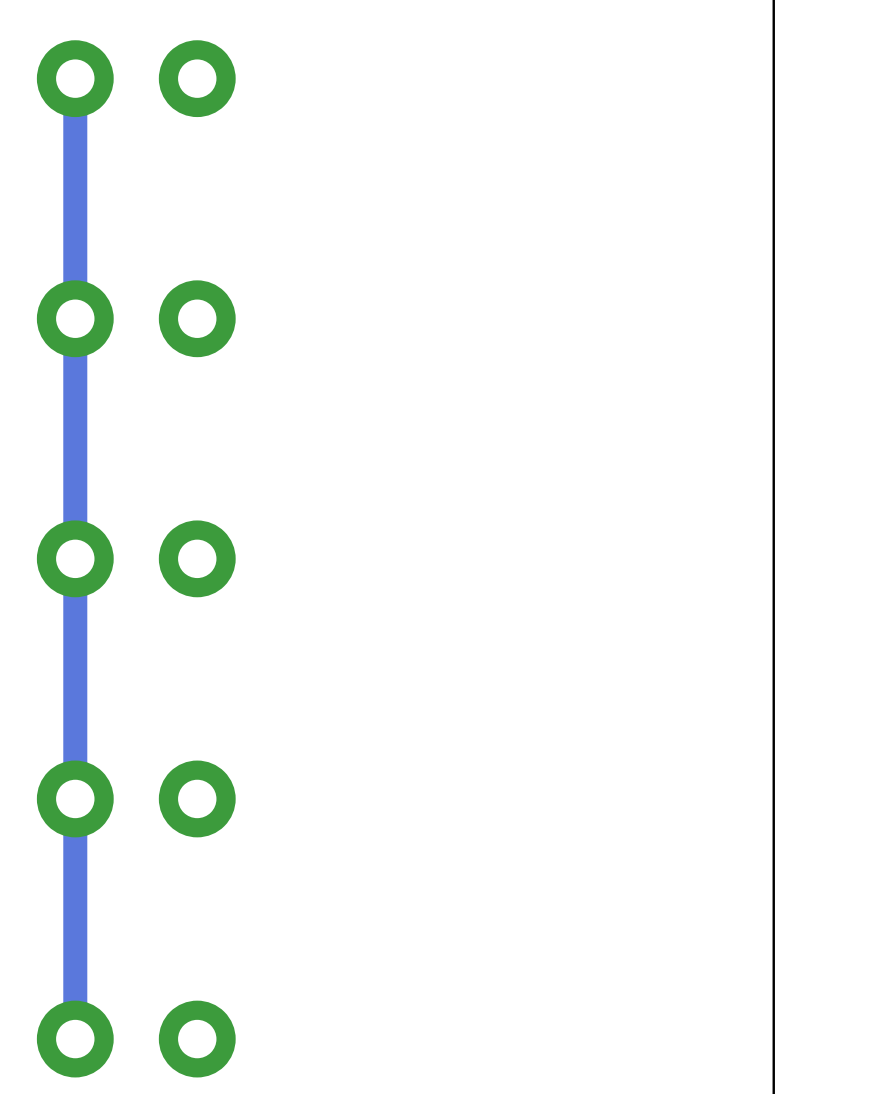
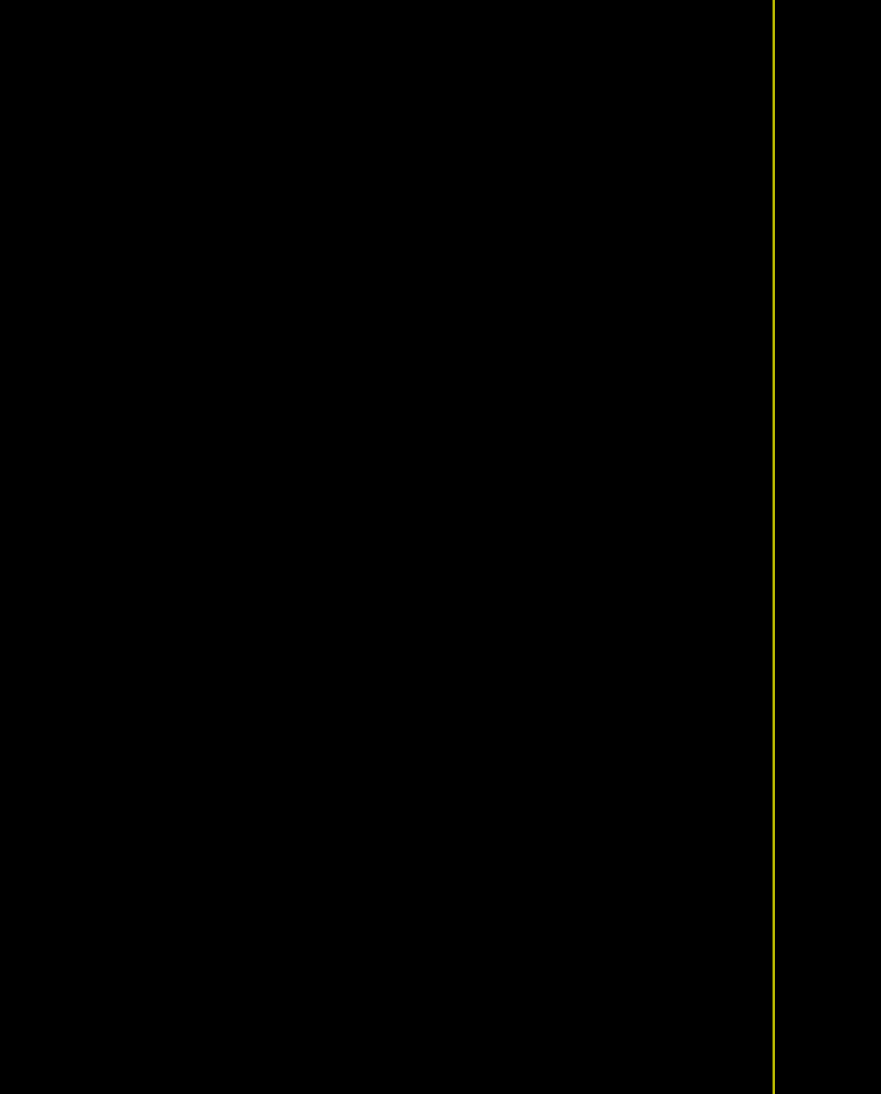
track: (75, 78) (75, 1039) -> none
part: (136, 78) -> none
part: (136, 318) -> none
part: (136, 558) -> none
part: (136, 798) -> none
part: (136, 1039) -> none

